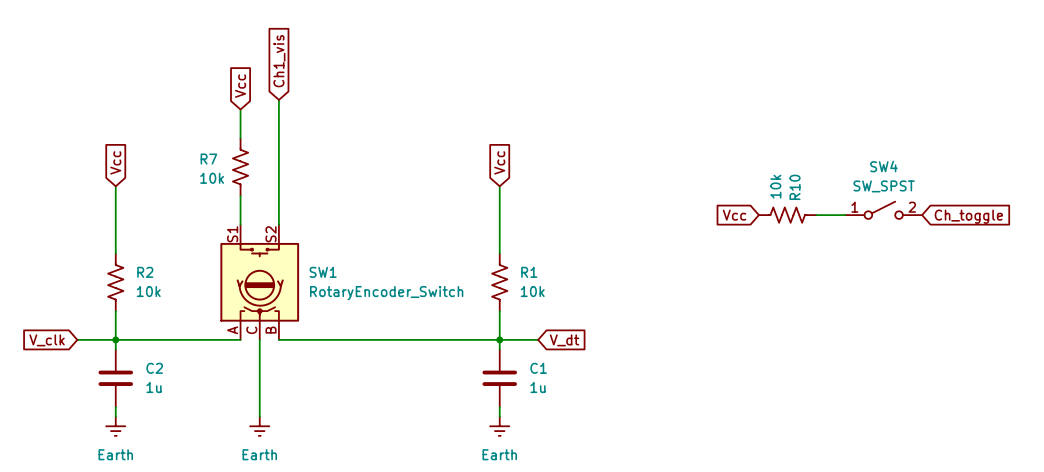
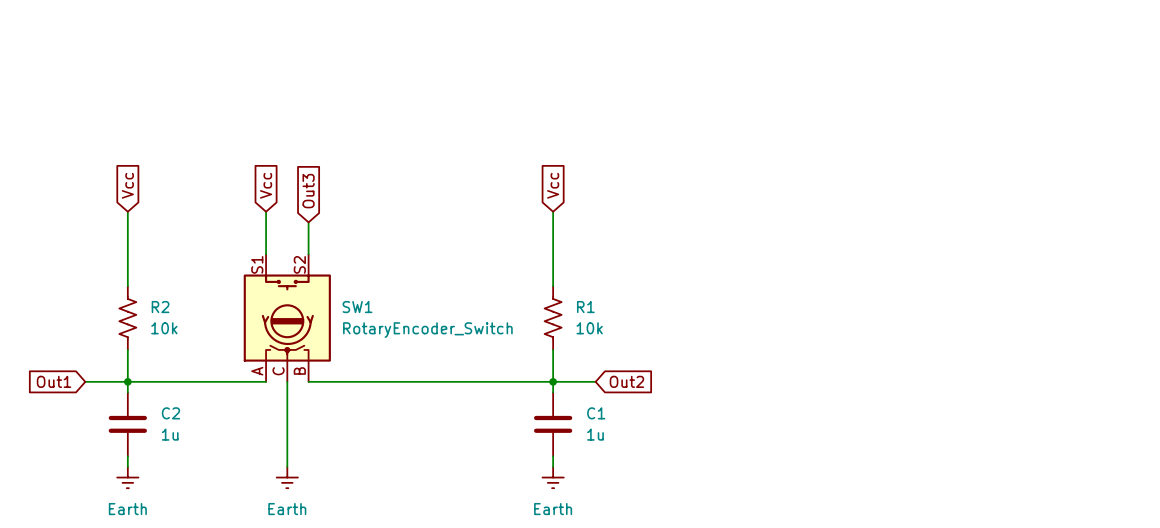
global label: Ch1_vis (279, 61) -> none
global label position: Vcc (240, 86) -> Vcc (266, 185)
wire: (278, 99) (278, 195) -> none
wire: (240, 109) (240, 138) -> none
R7: 10k (240, 167) -> none
global label: none -> Out3 (308, 191)
SW4: SW_SPST (883, 210) -> none
global label: Vcc (734, 215) -> none
R10: 10k (787, 215) -> none
wire: (816, 215) (845, 215) -> none
global label: Ch_toggle (968, 216) -> none
global label: V_clk (47, 340) -> Out1 (54, 381)
global label: V_dt (564, 340) -> Out2 (626, 381)

